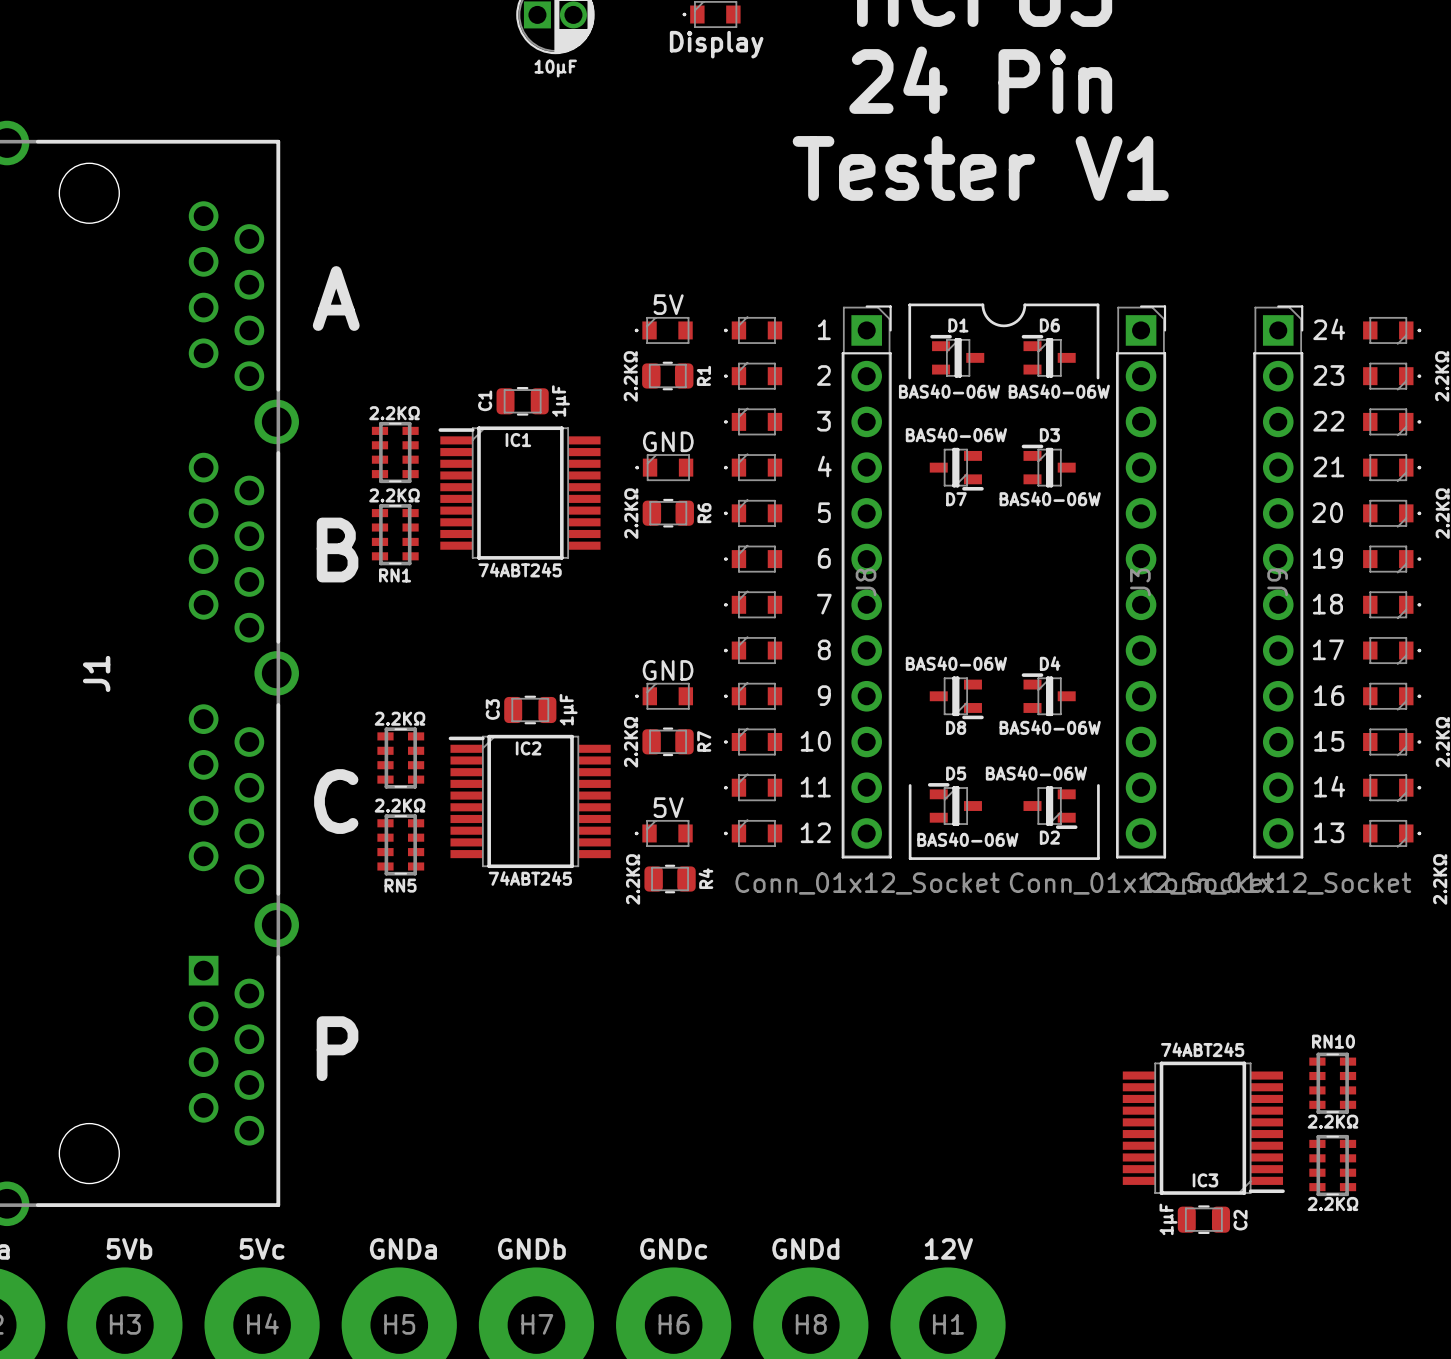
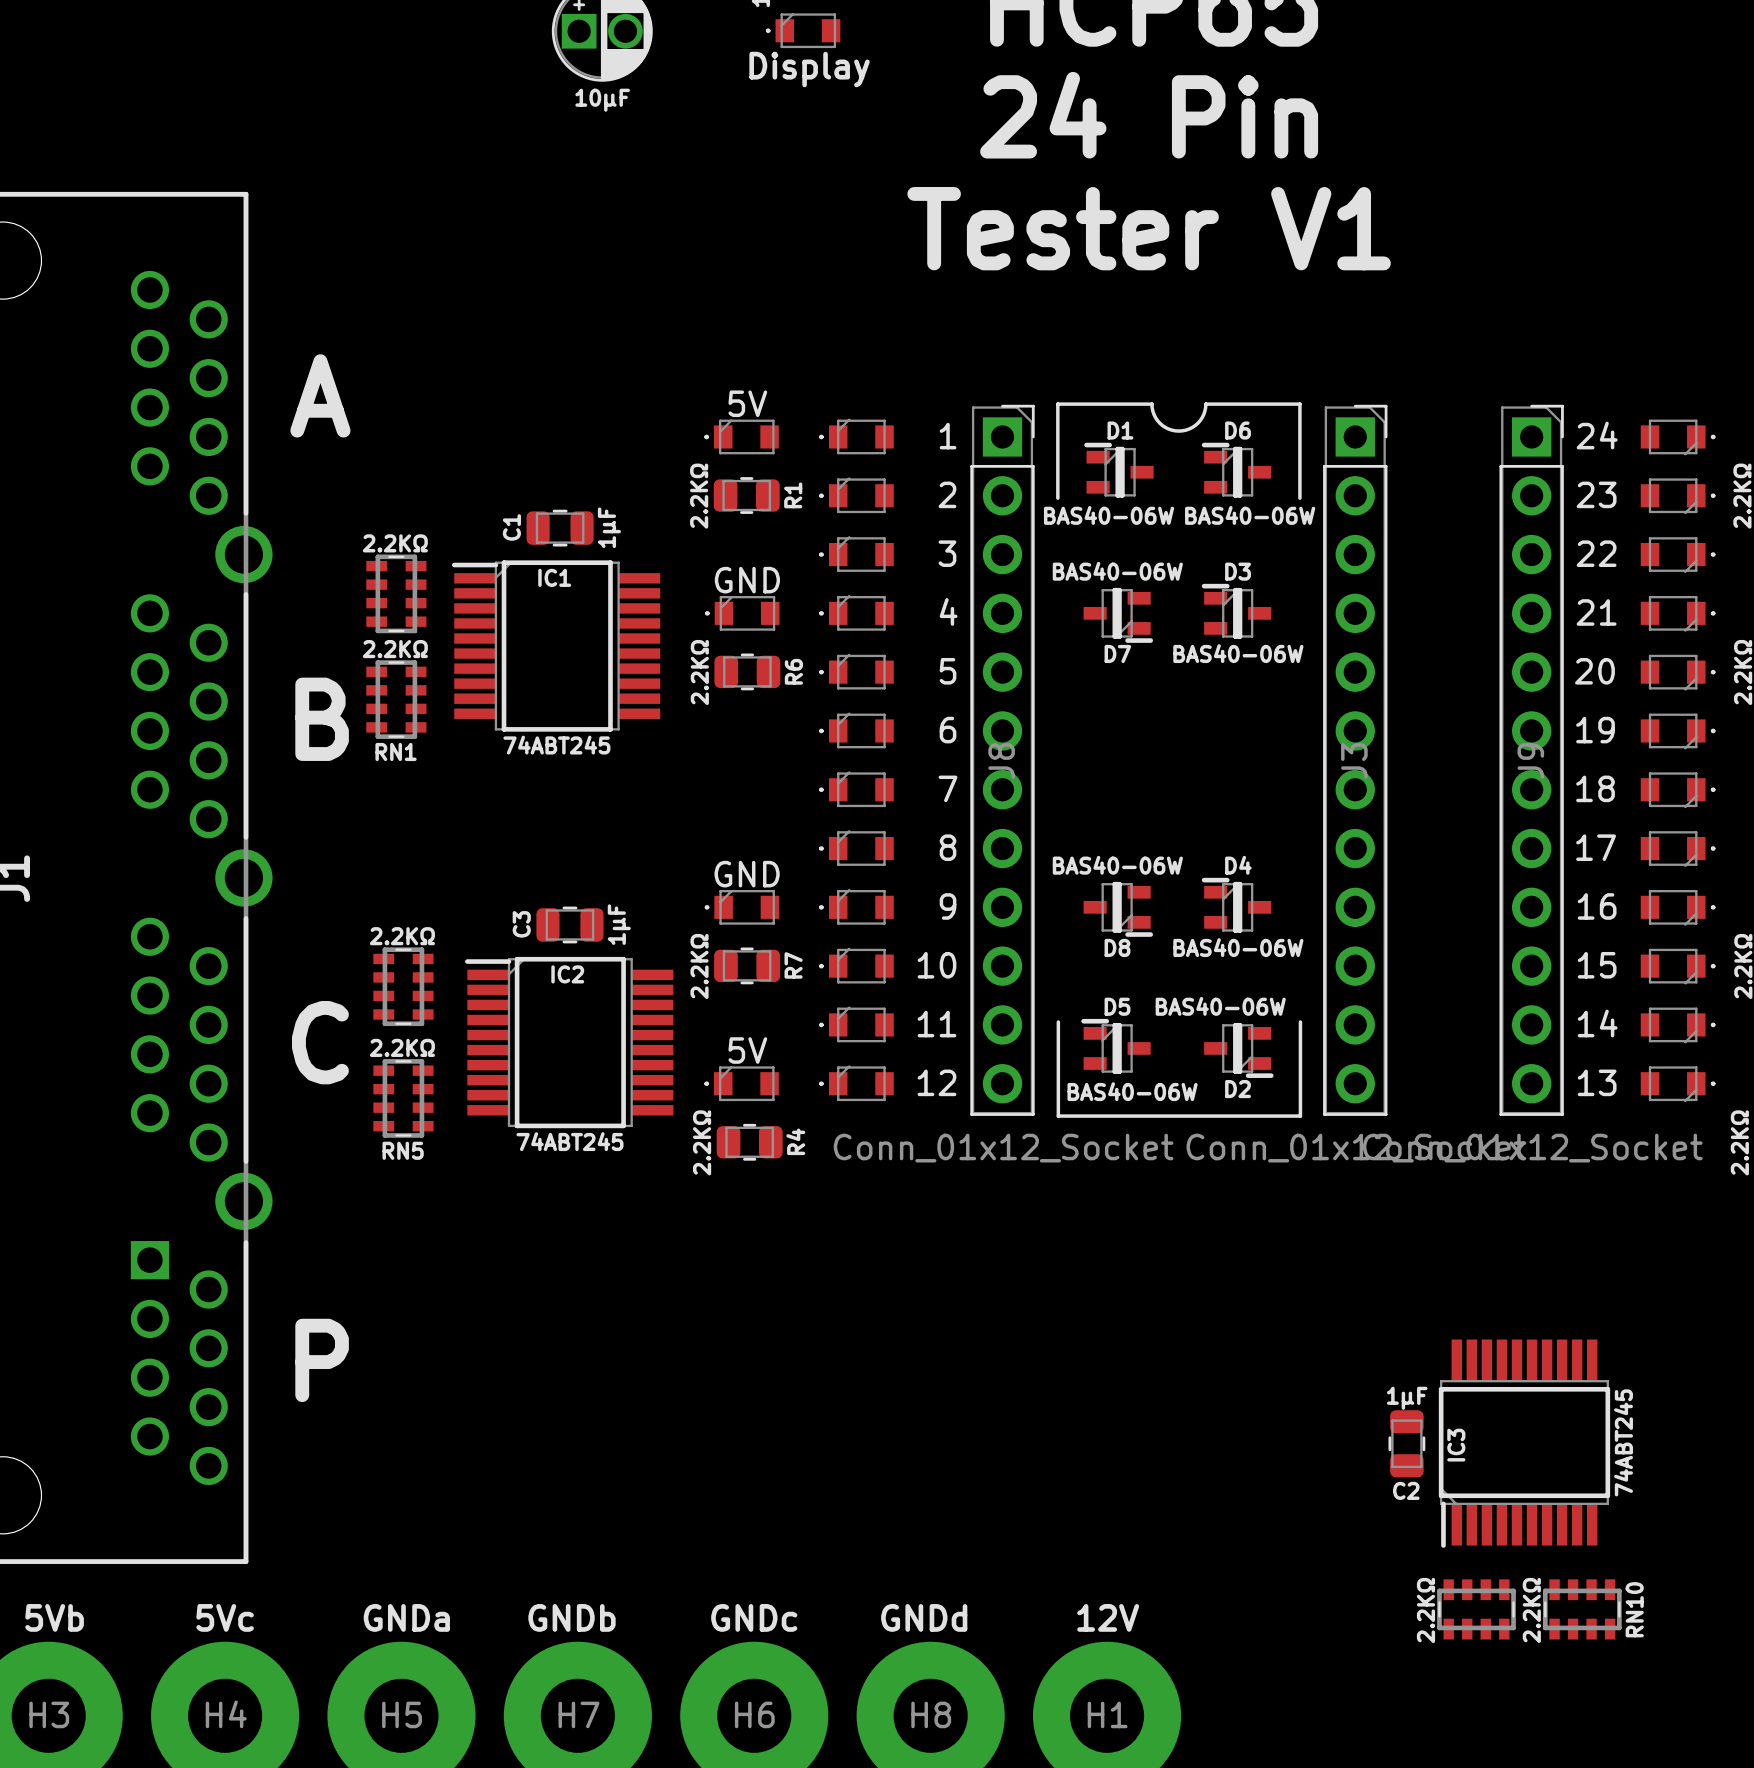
RN10 rotation: 0° (1332, 1083) -> 90° clockwise (1582, 1609)
RN10 position: (1332, 1083) -> (1582, 1609)
IC3 rotation: 0° (1203, 1128) -> 90° clockwise (1524, 1443)
part rotation: 0° (1332, 1165) -> 90° clockwise (1476, 1609)
part position: (1332, 1165) -> (1476, 1609)
C2 rotation: 0° (1203, 1219) -> 90° clockwise (1406, 1443)
C2 position: (1203, 1219) -> (1406, 1443)

